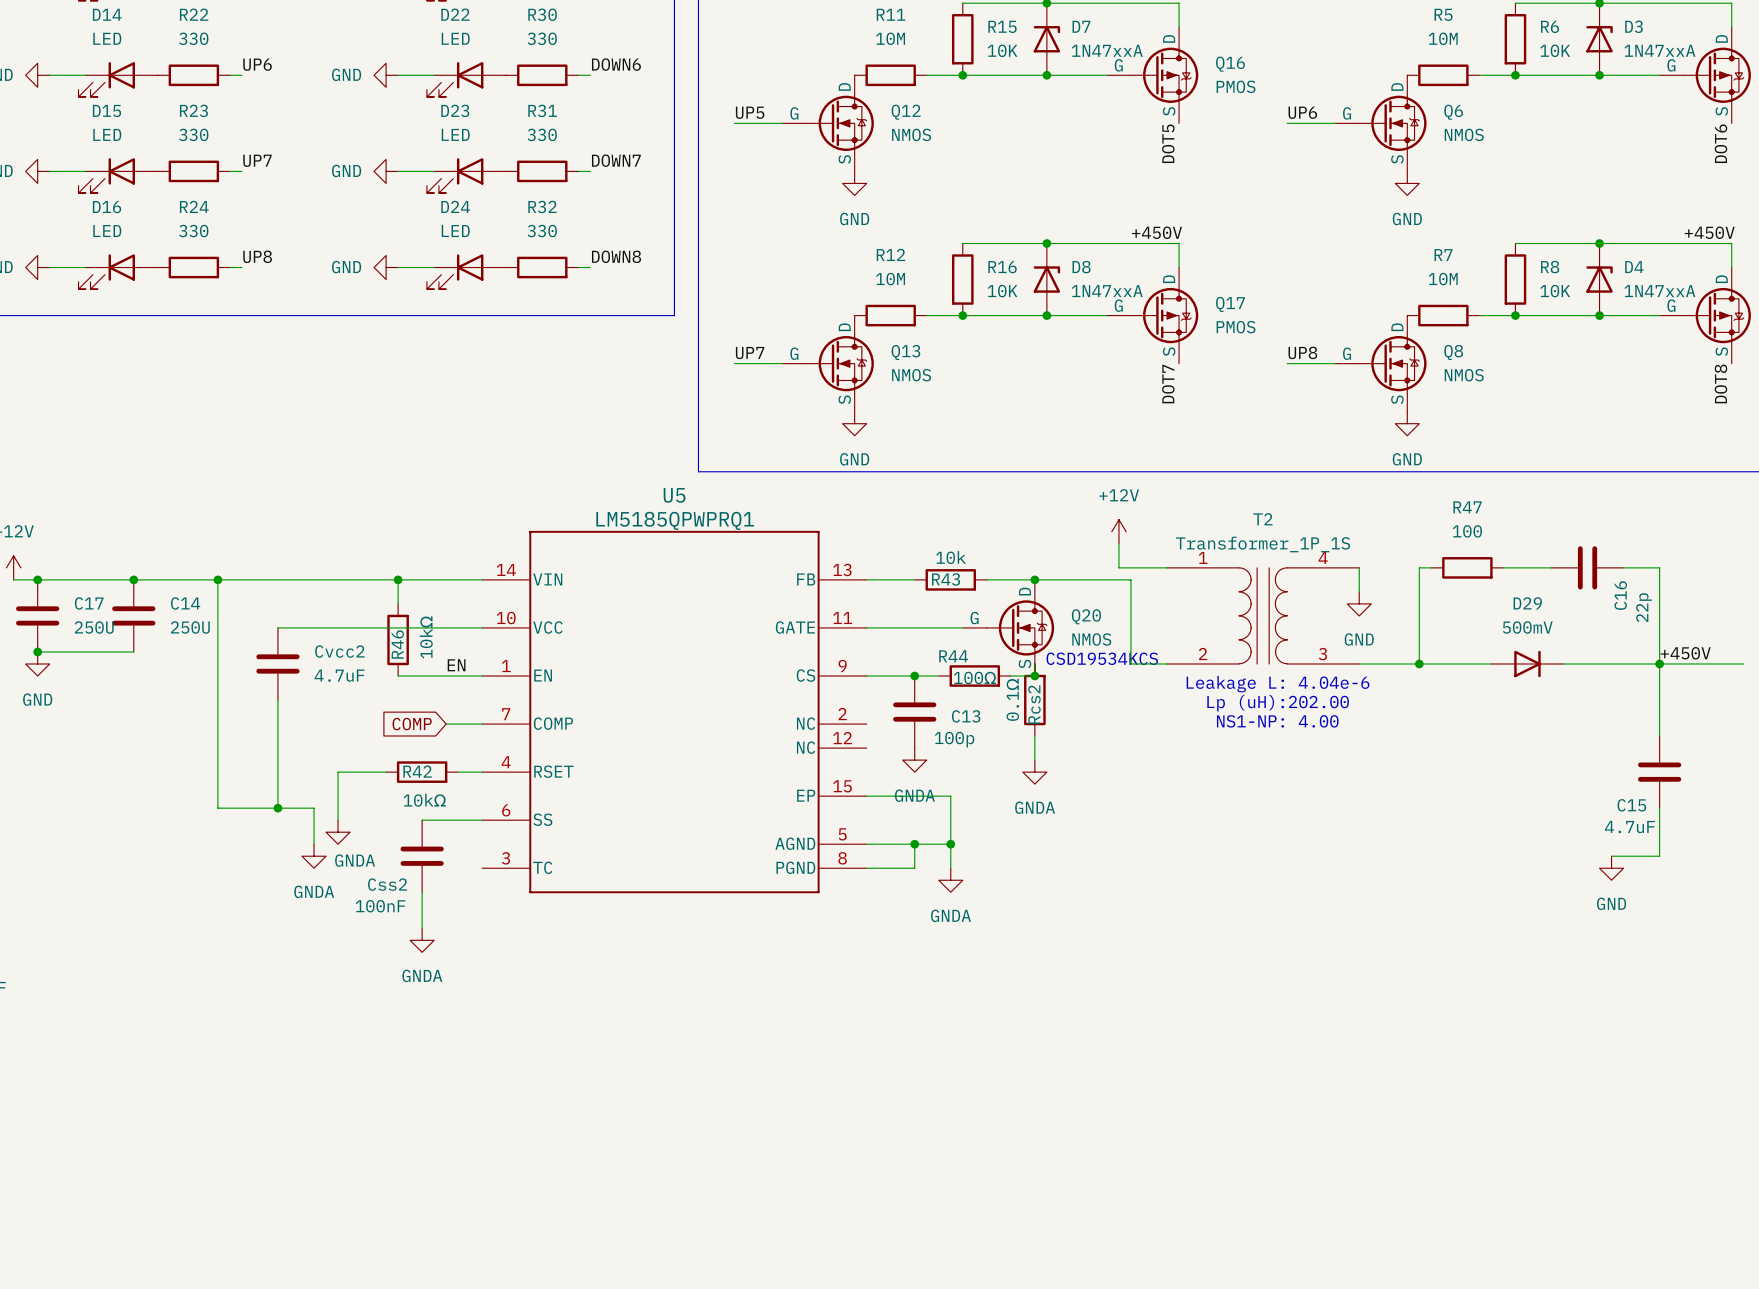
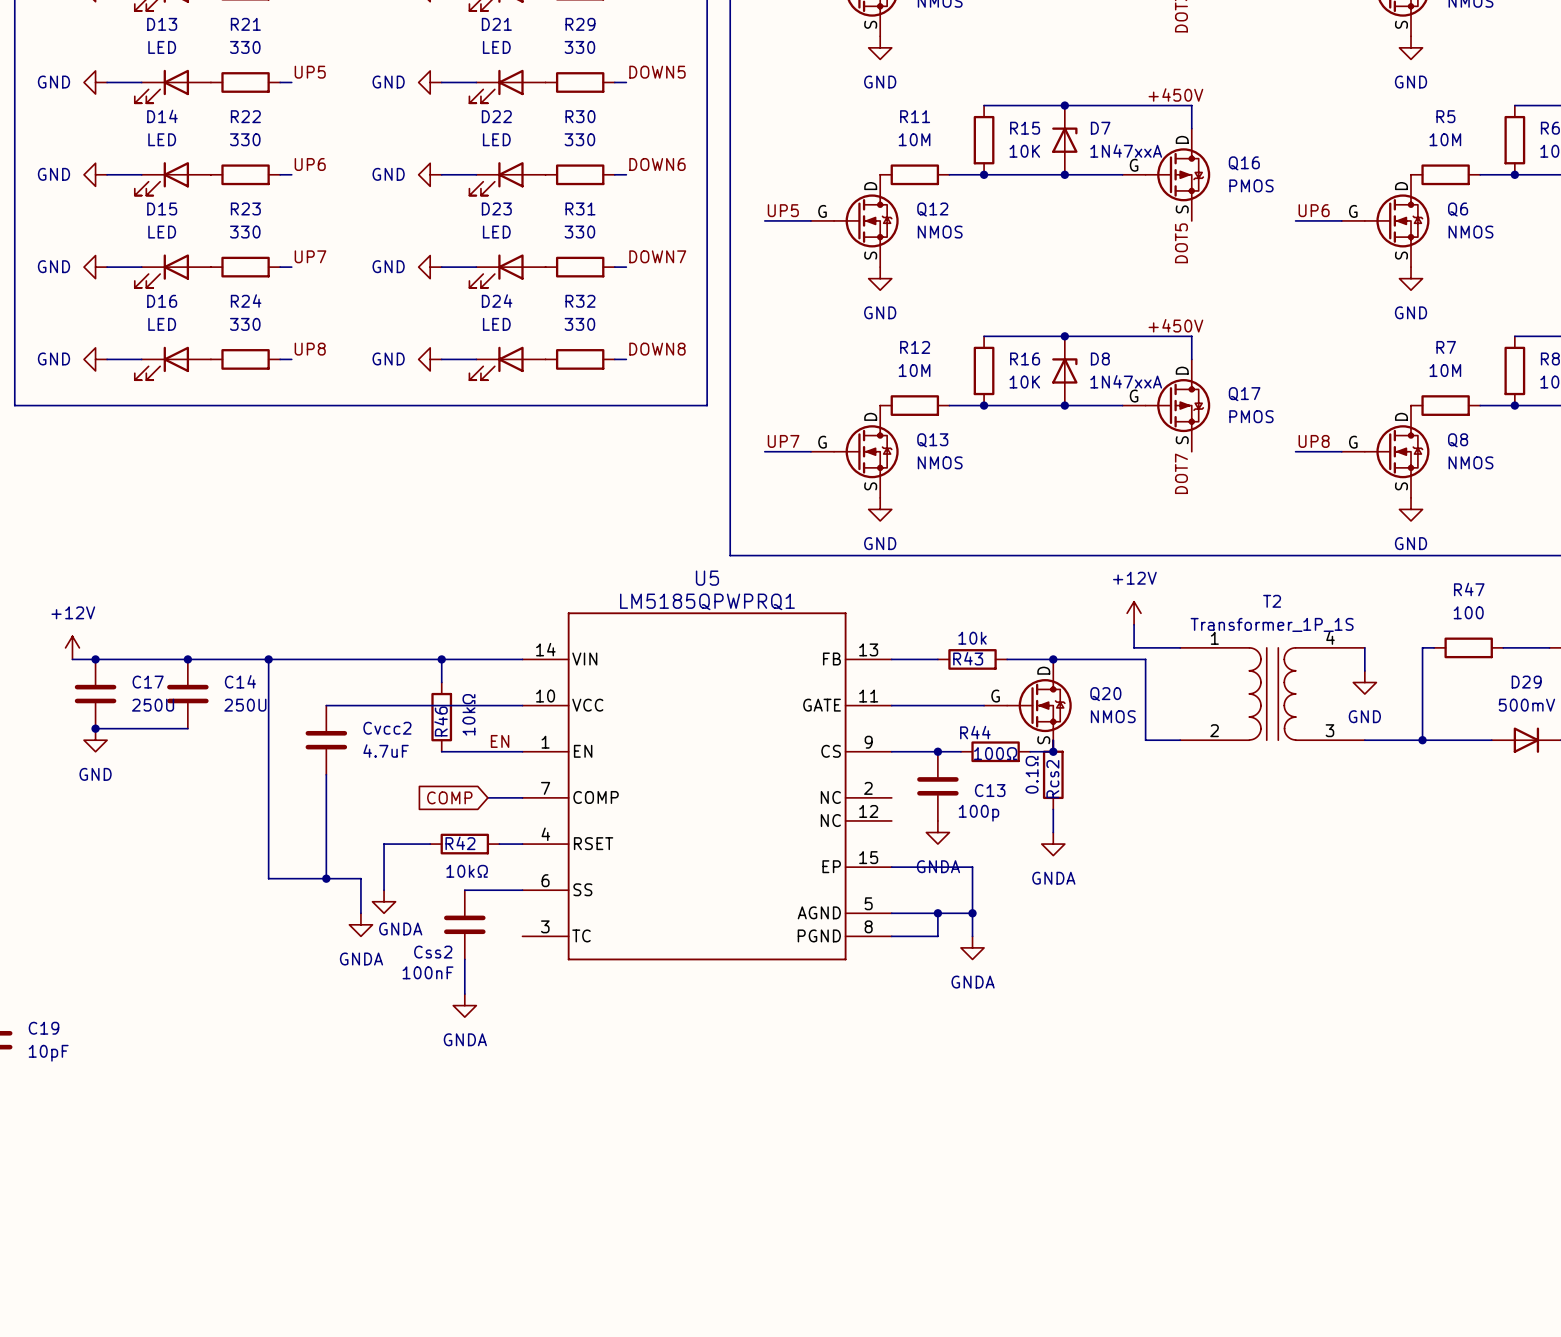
text: CSD19534KCS (1102, 658) -> none
text: Leakage L: 4.04e-6 (1278, 684) -> none
text: Lp (uH):202.00 (1278, 703) -> none
text: NS1-NP: 4.00 (1277, 721) -> none

